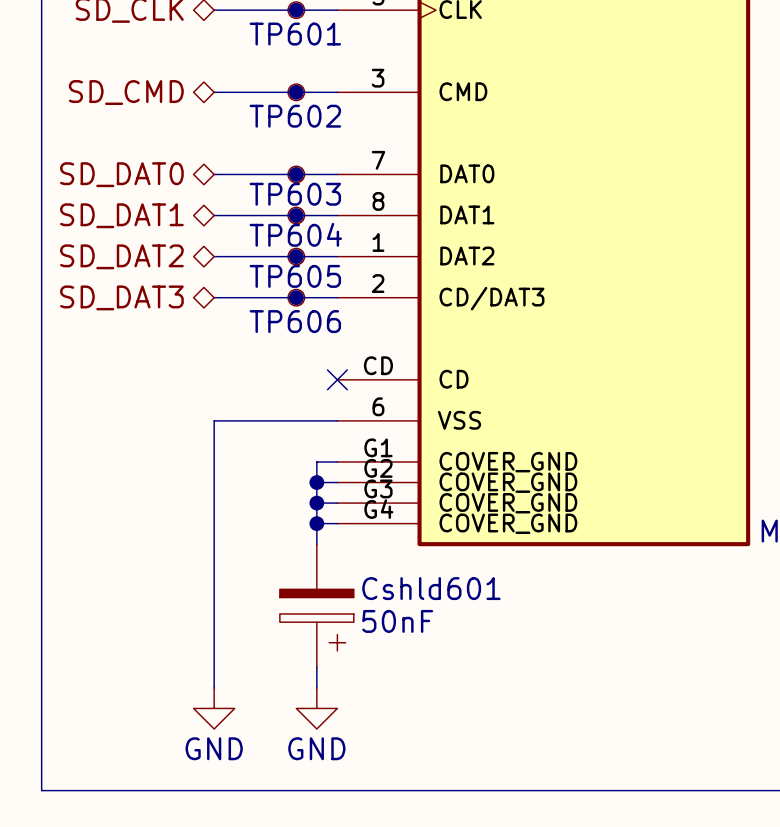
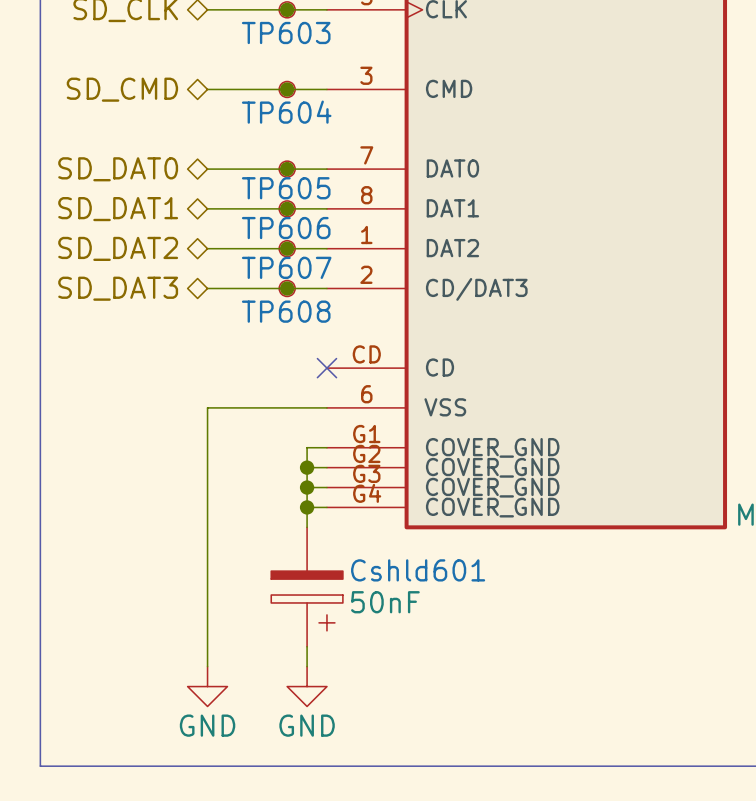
TP601 name: TP601 (295, 34) -> TP603 (286, 32)
TP602 name: TP602 (295, 116) -> TP604 (286, 112)
TP603 name: TP603 (295, 194) -> TP605 (286, 188)
TP604 name: TP604 (295, 234) -> TP606 (286, 228)
TP605 name: TP605 (295, 276) -> TP607 (286, 267)
TP606 name: TP606 (295, 321) -> TP608 (286, 311)

